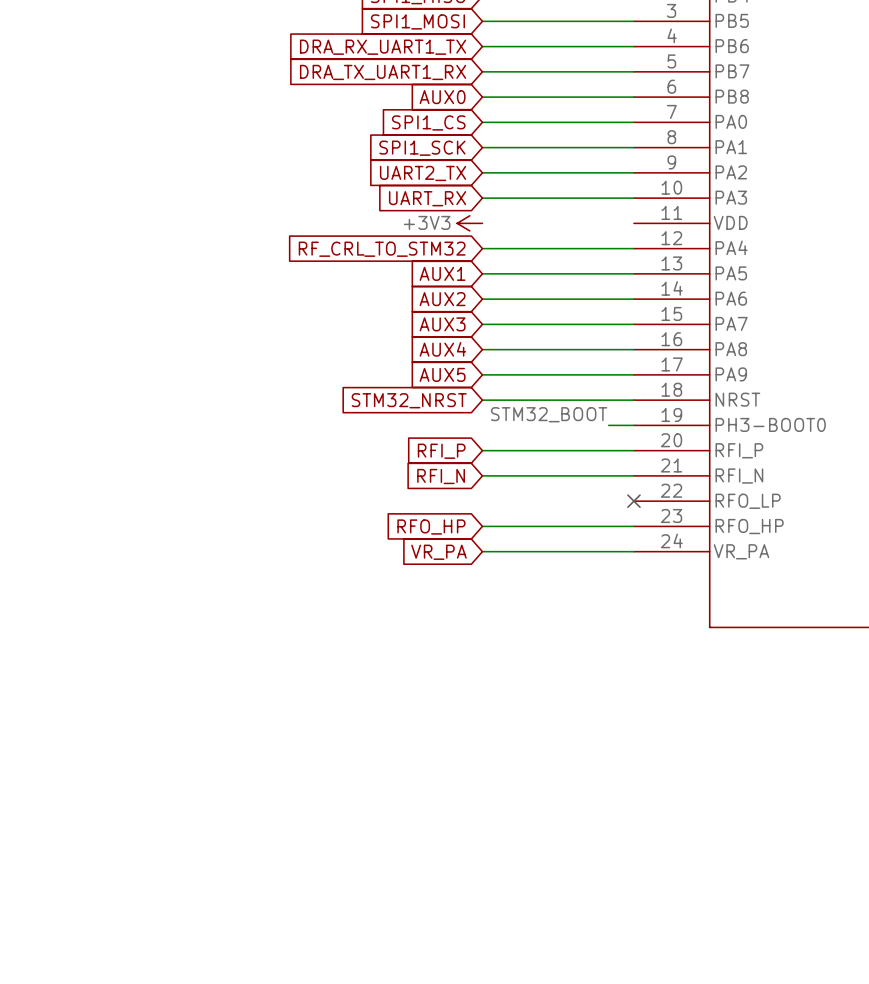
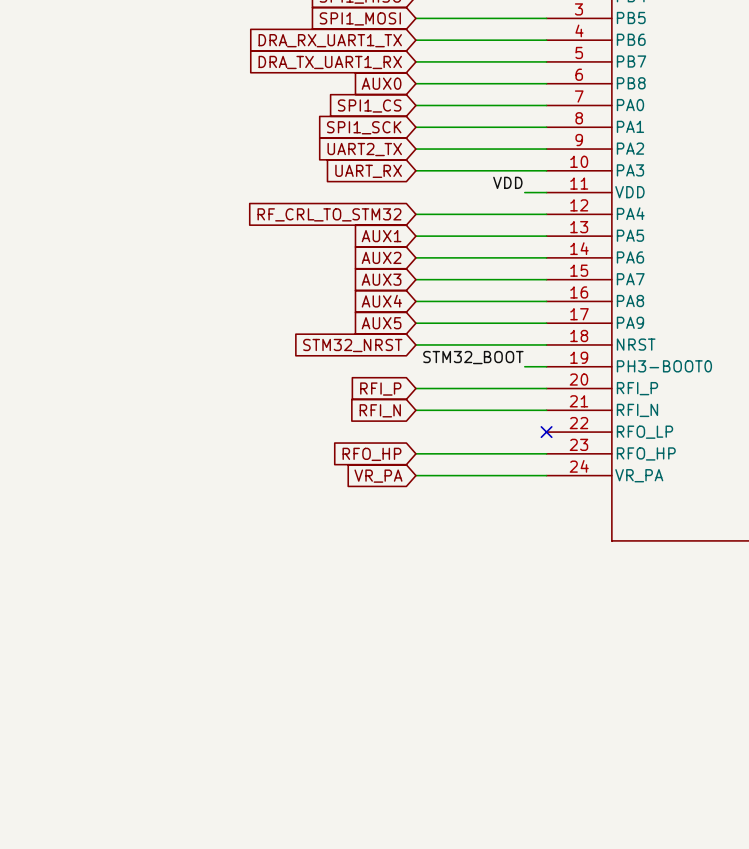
label: none -> VDD (507, 182)
power symbol: +3V3 (469, 223) -> none
wire: none -> (524, 192) (546, 192)

